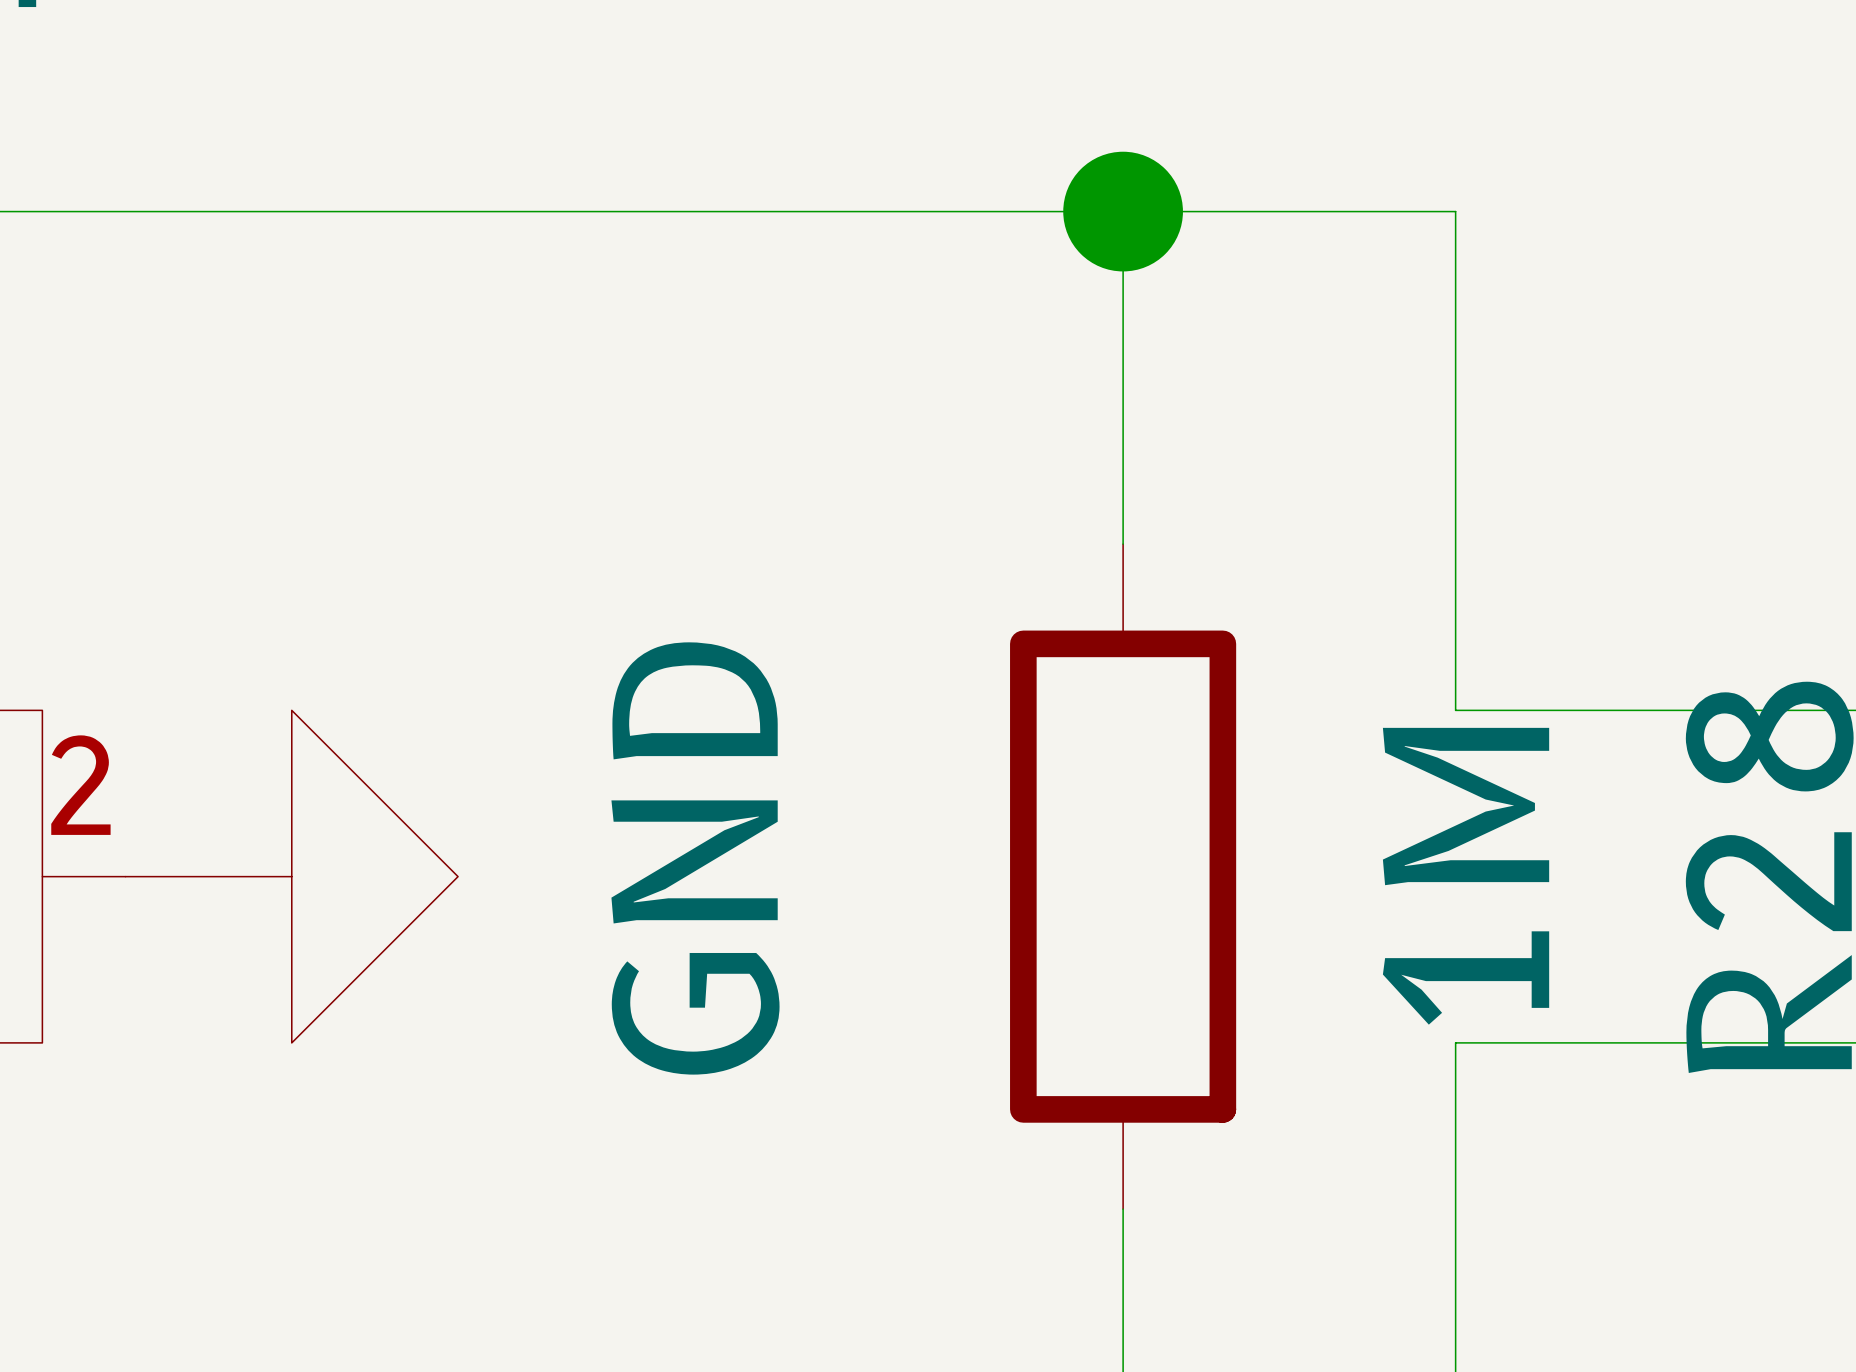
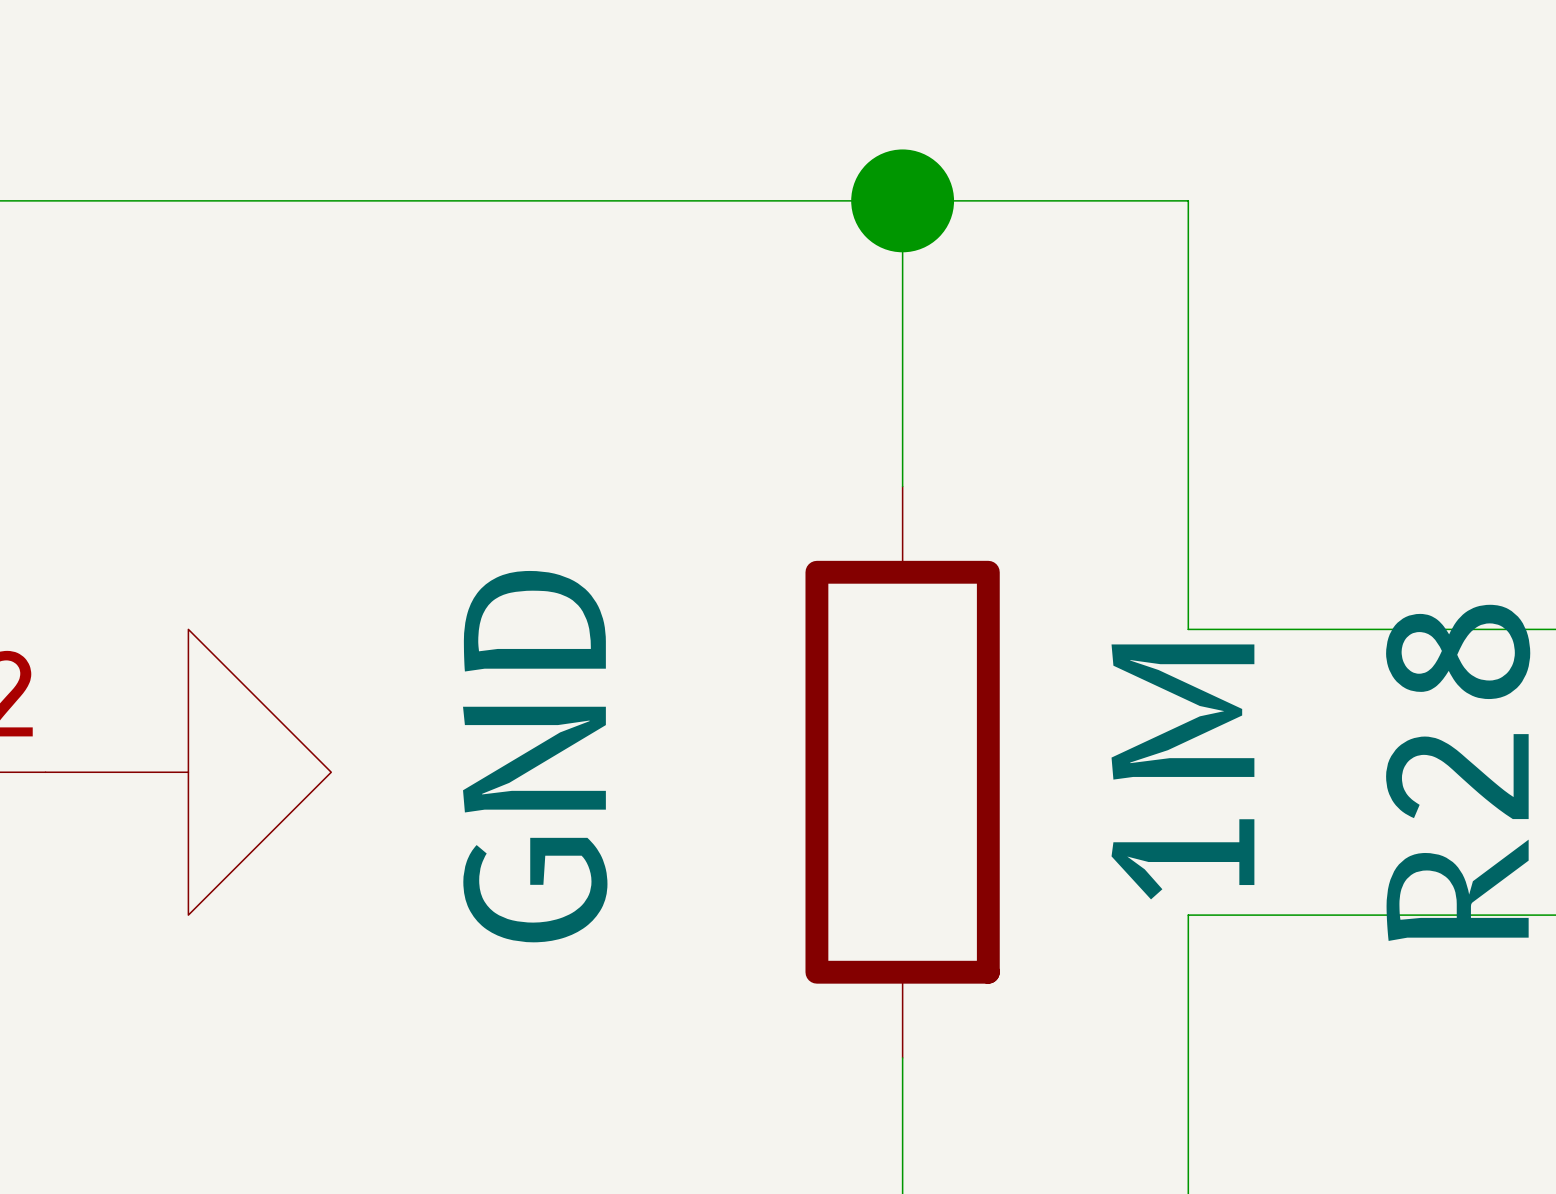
R28 value position: 1M (1466, 876) -> 1M (1182, 771)

